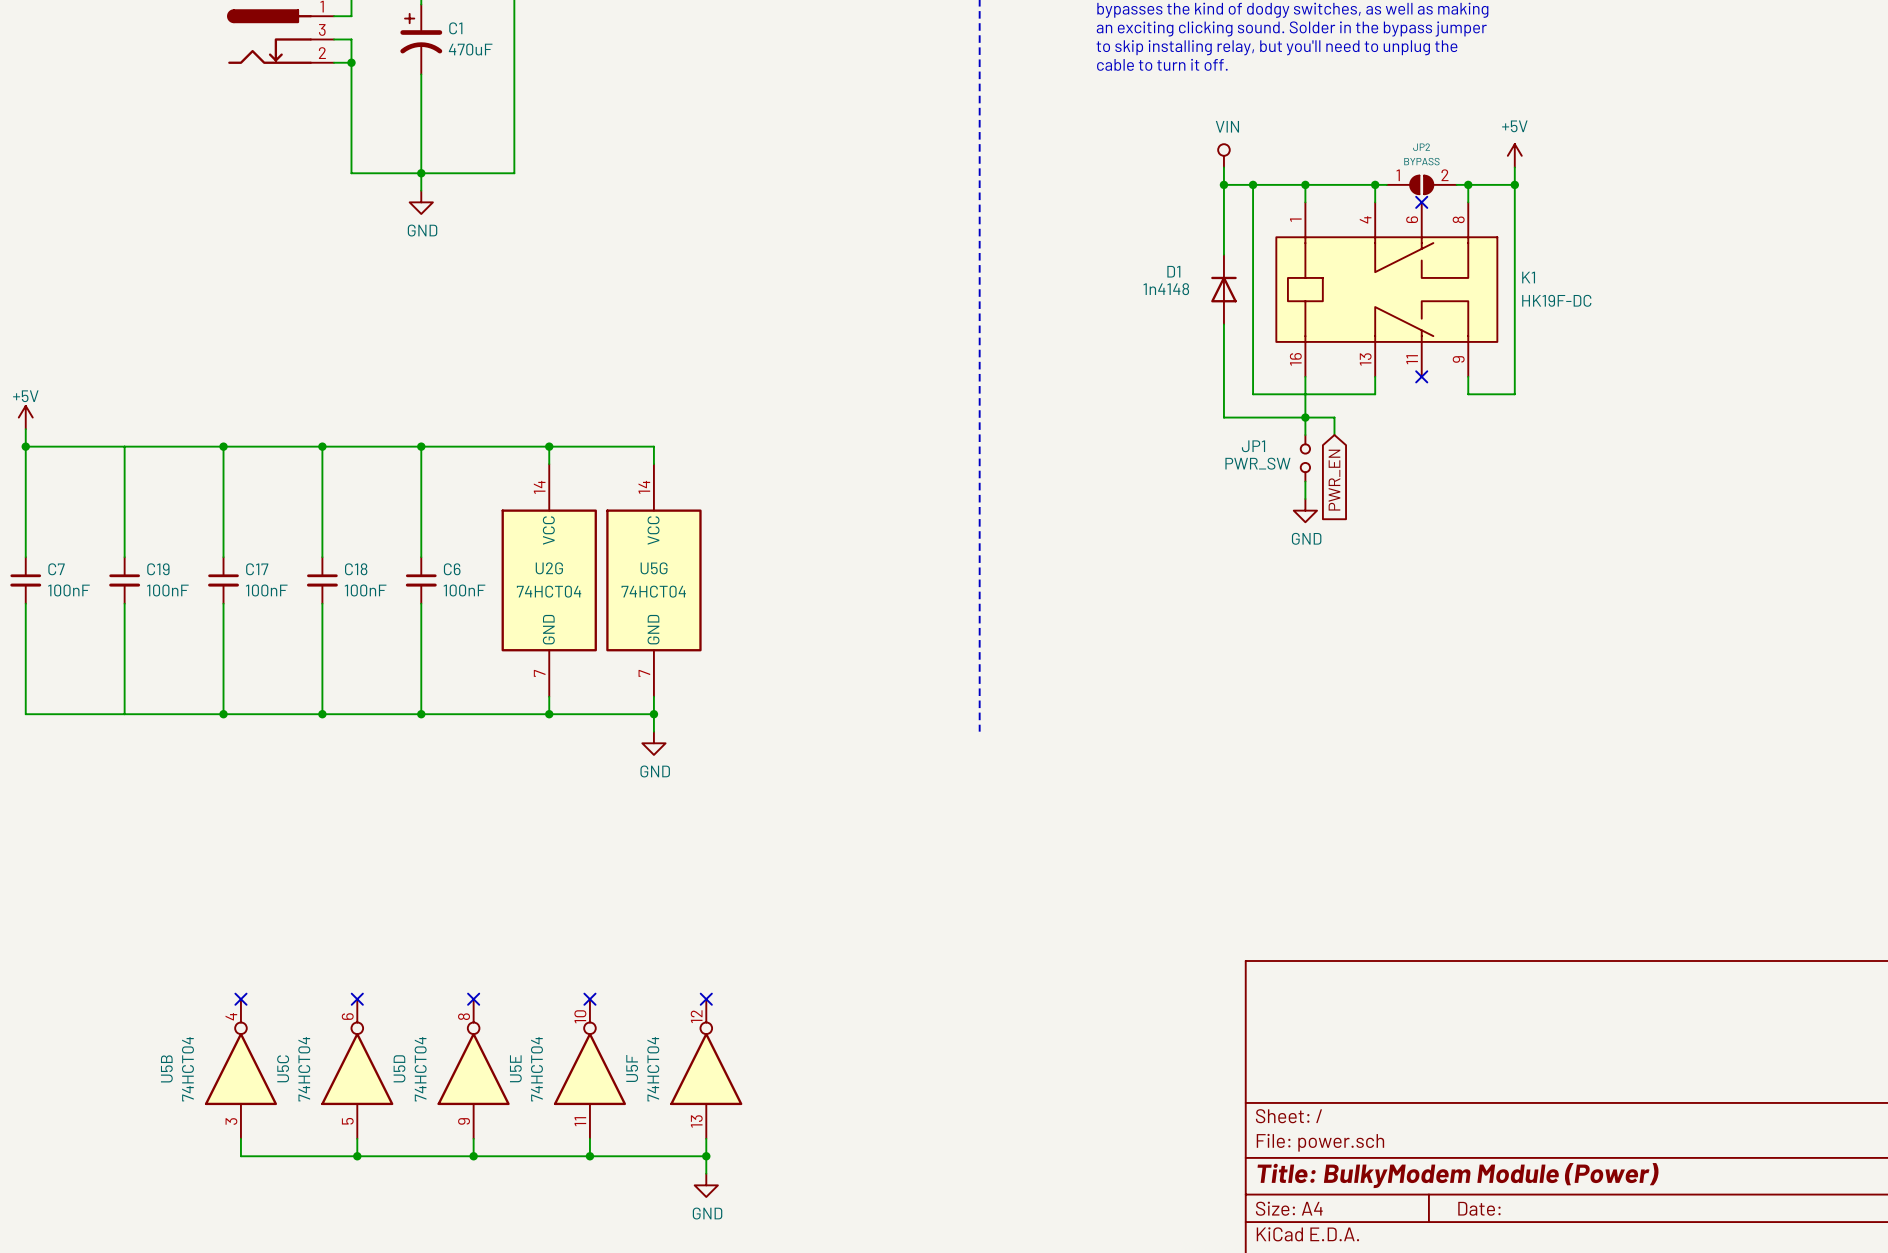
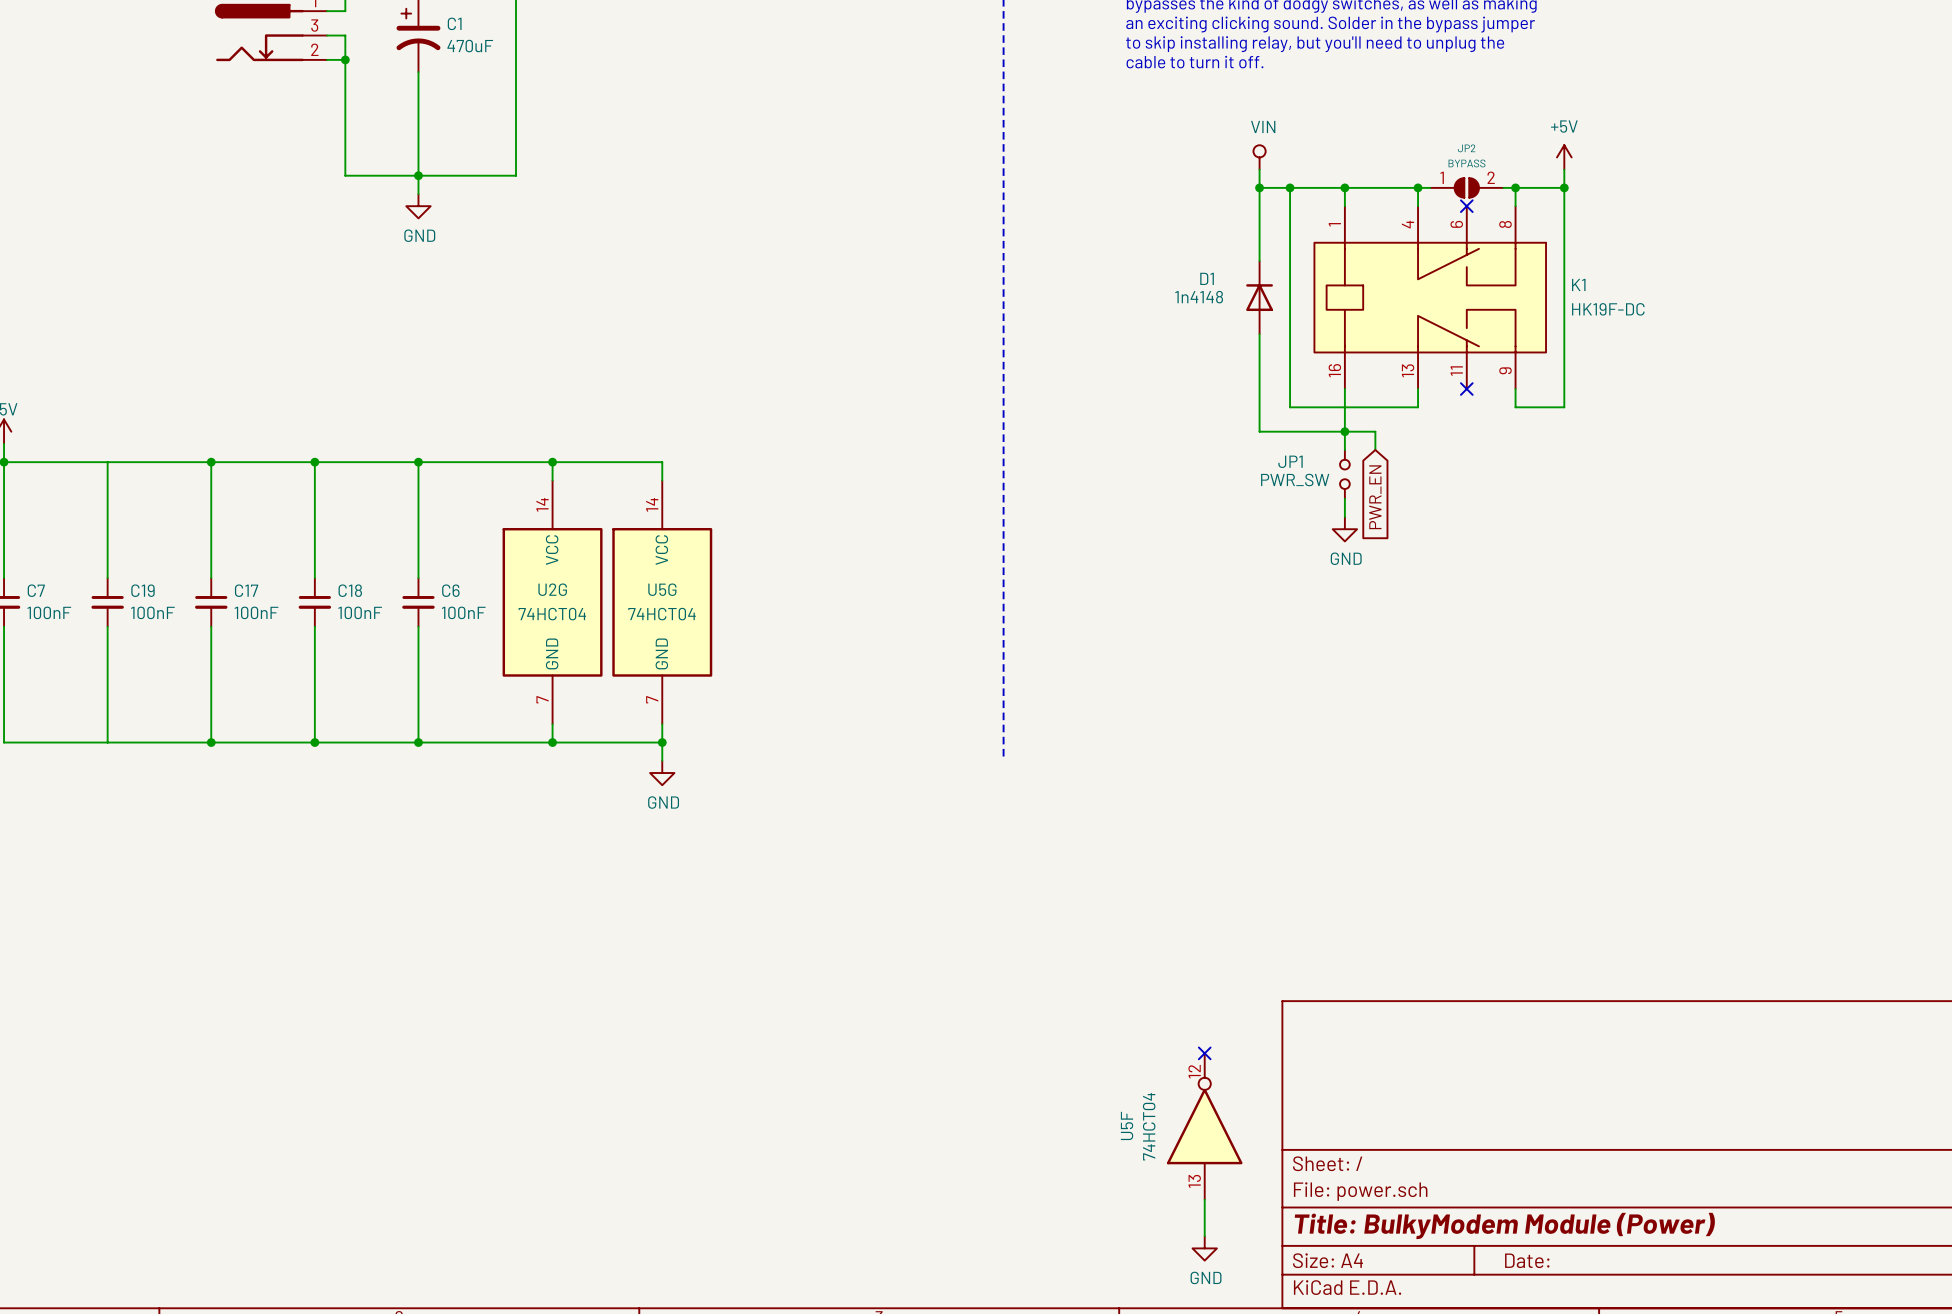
no-connect mark: (240, 999) -> none
no-connect mark: (357, 999) -> none
no-connect mark: (473, 999) -> none
no-connect mark: (589, 999) -> none
no-connect mark: (706, 999) -> none
no-connect mark: none -> (1204, 1053)
U5B: 74HCT04 (240, 1069) -> none
U5C: 74HCT04 (357, 1069) -> none
U5D: 74HCT04 (473, 1069) -> none
U5E: 74HCT04 (589, 1069) -> none
U5F position: (706, 1069) -> (1204, 1126)
wire: (240, 1138) (240, 1156) (706, 1156) -> none
wire: (357, 1138) (357, 1156) -> none
wire: (473, 1138) (473, 1156) -> none
wire: (589, 1138) (589, 1156) -> none
wire: (706, 1138) (706, 1173) -> none
wire: none -> (1204, 1199) (1204, 1236)
junction: (357, 1156) -> none
junction: (473, 1156) -> none
junction: (589, 1156) -> none
junction: (706, 1156) -> none
power symbol: GND (706, 1185) -> none
power symbol: none -> GND (1204, 1248)

